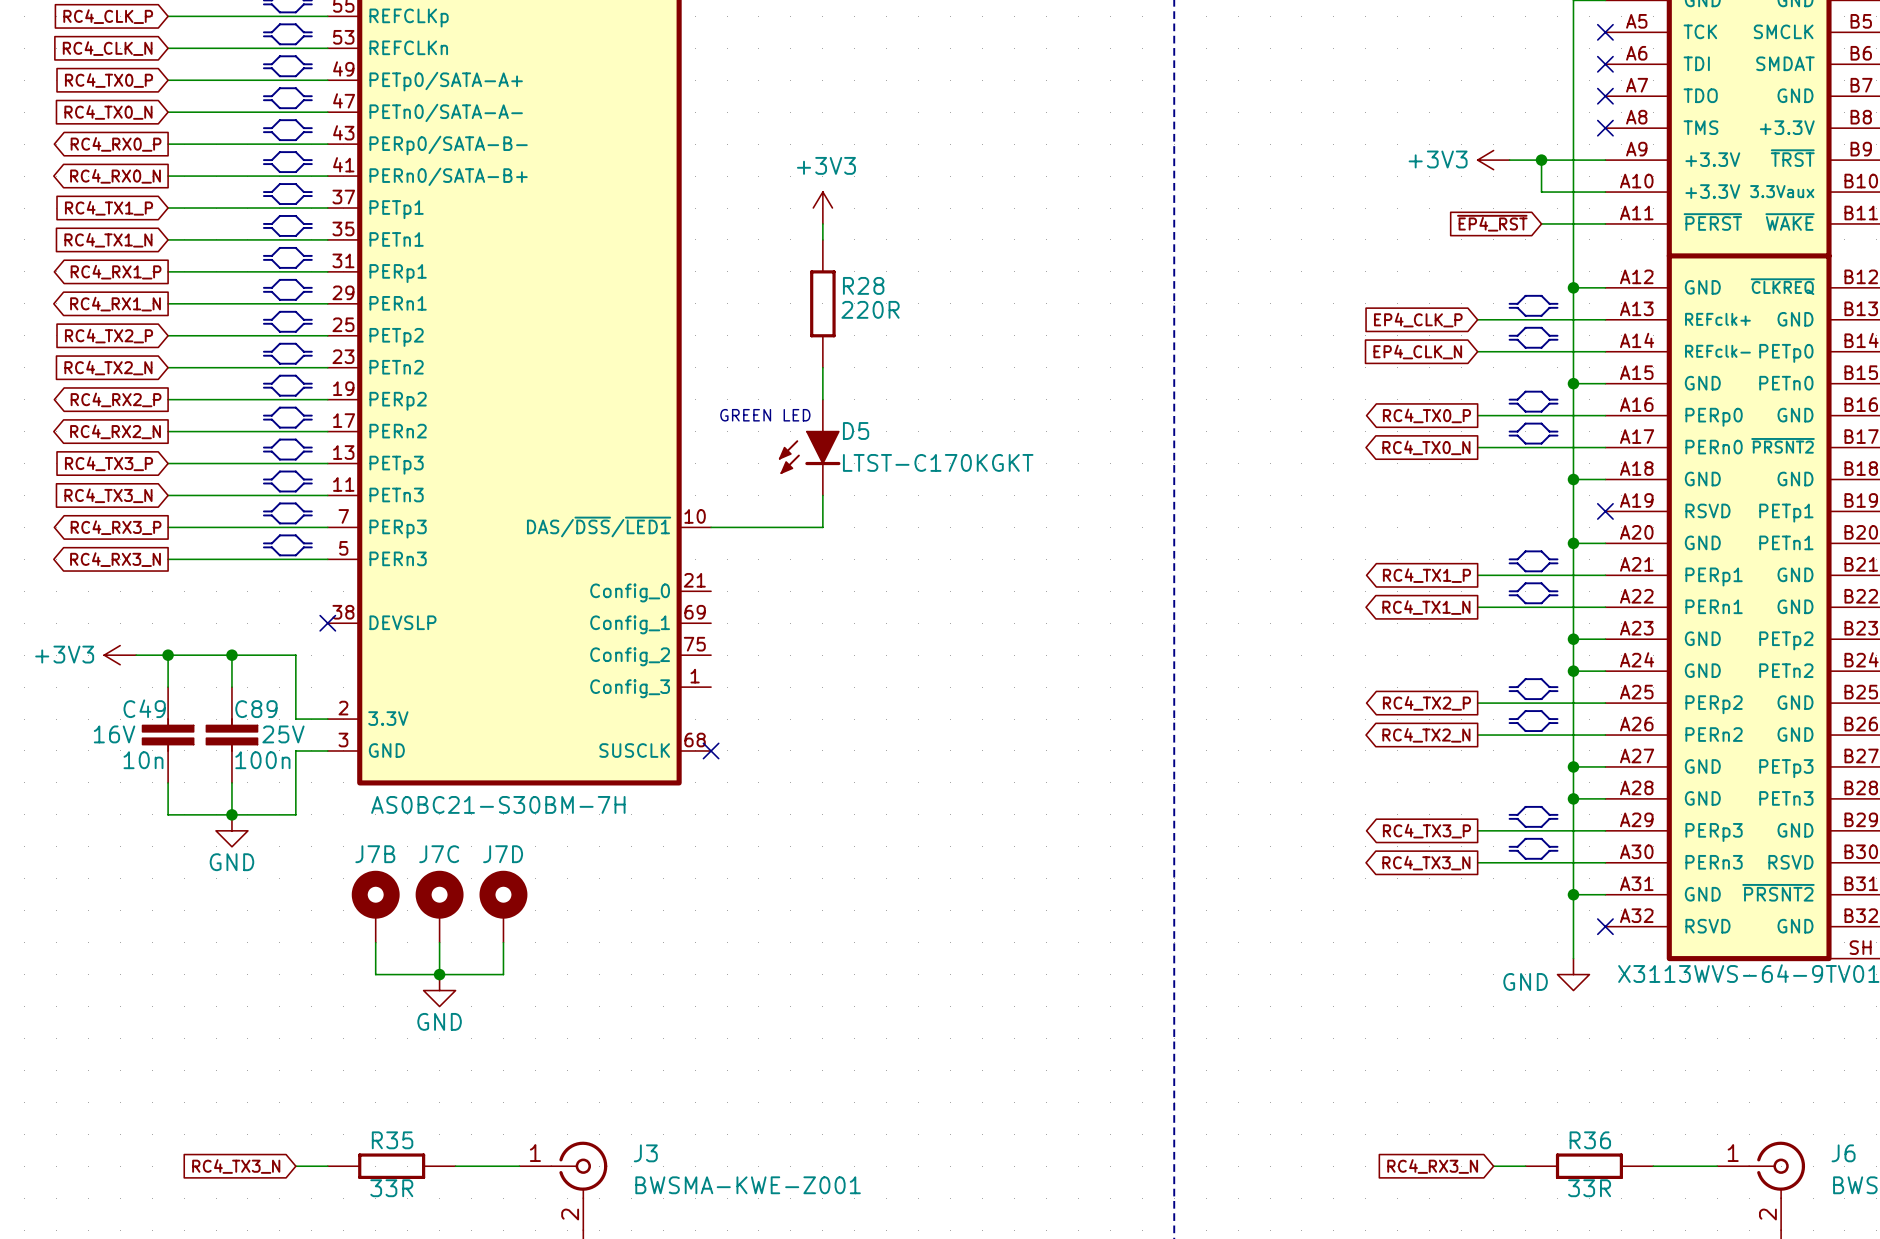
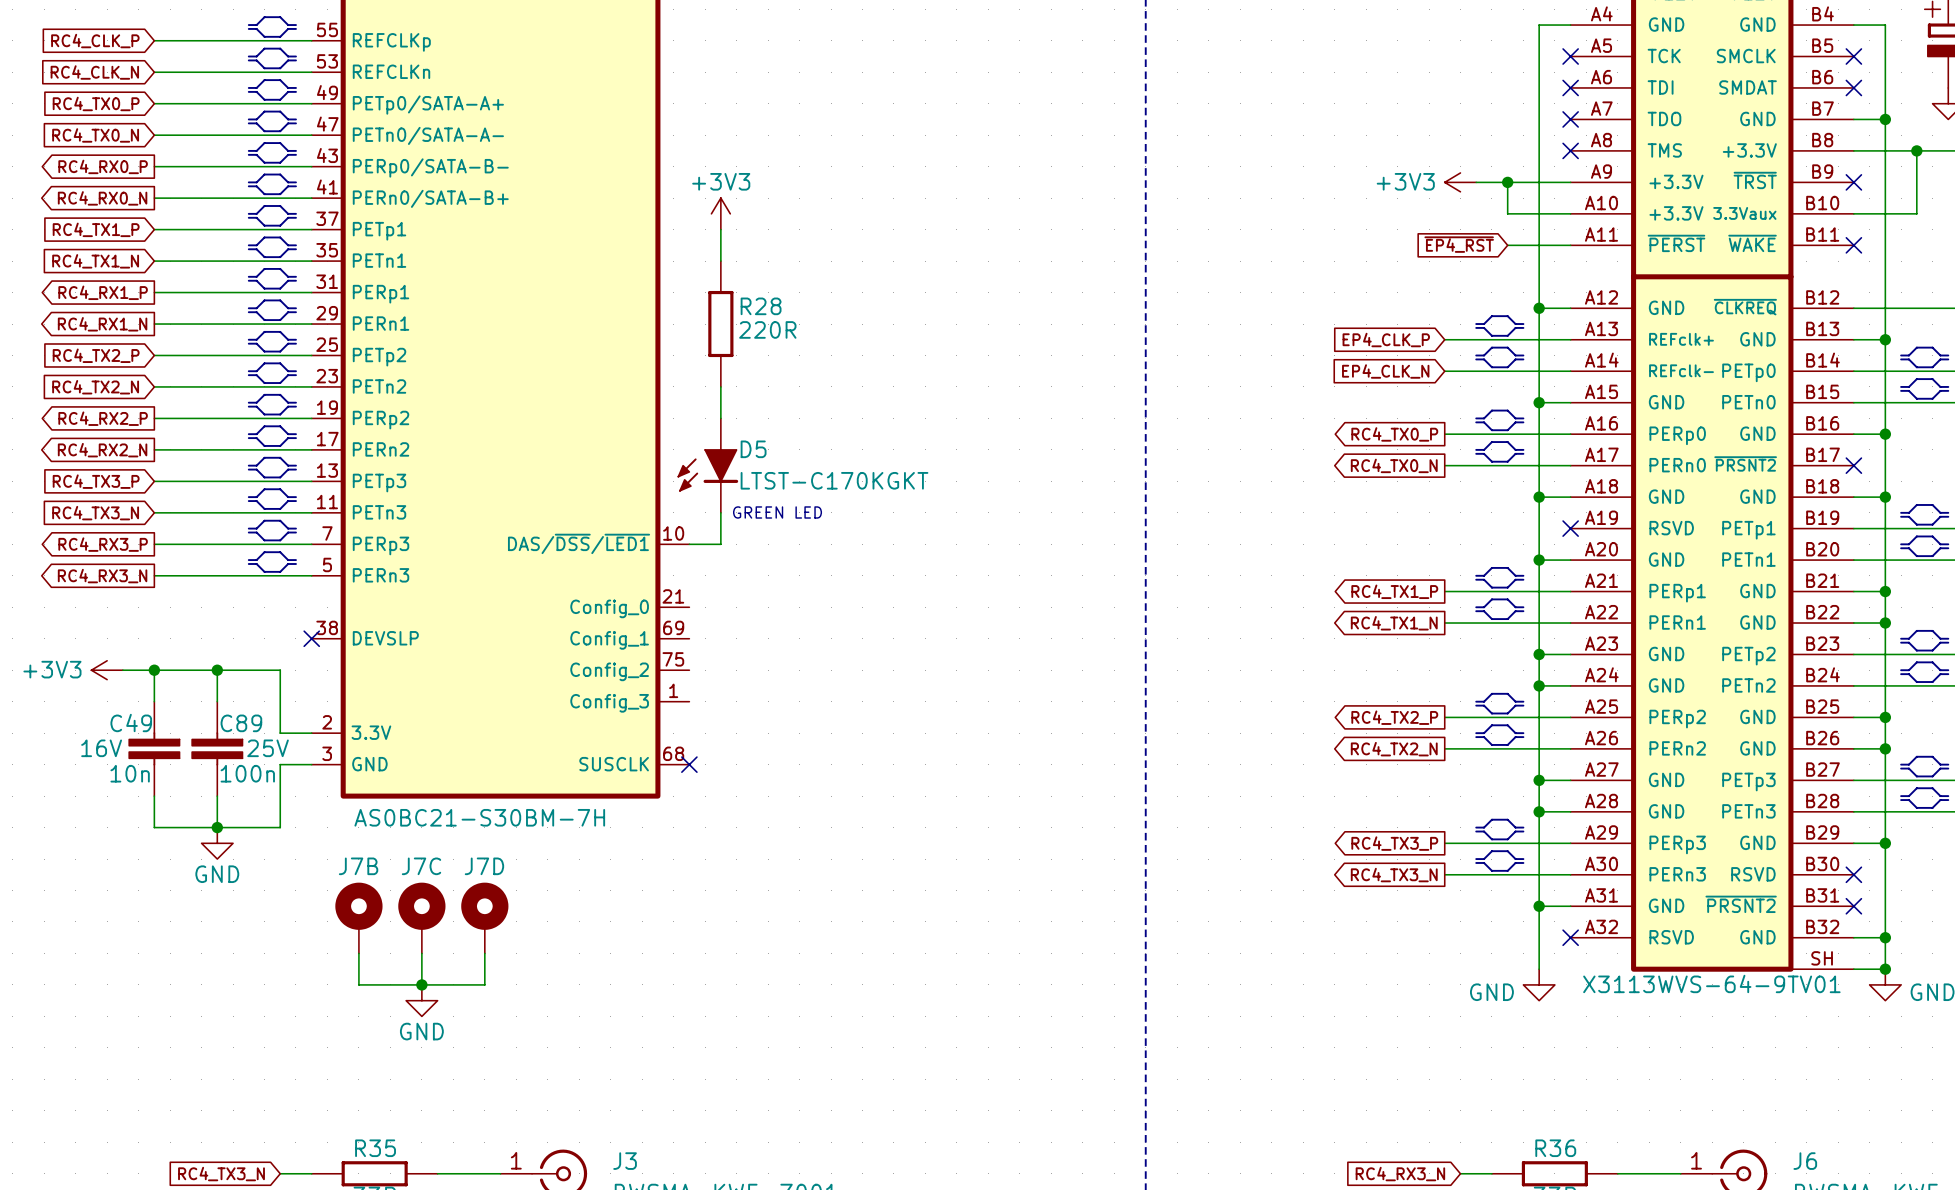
power symbol text position: +3V3 (826, 165) -> +3V3 (721, 181)
wire: none -> (720, 229) (720, 261)
power symbol position: +3V3 (822, 208) -> +3V3 (720, 213)
wire: (822, 223) (822, 239) -> none
R28 position: (822, 303) -> (720, 324)
wire: (822, 367) (822, 399) -> (720, 386) (720, 418)
text position: GREEN LED (765, 415) -> GREEN LED (777, 512)
D5 position: (809, 447) -> (707, 465)
wire: (822, 495) (822, 527) (743, 527) -> (720, 512) (720, 544)

